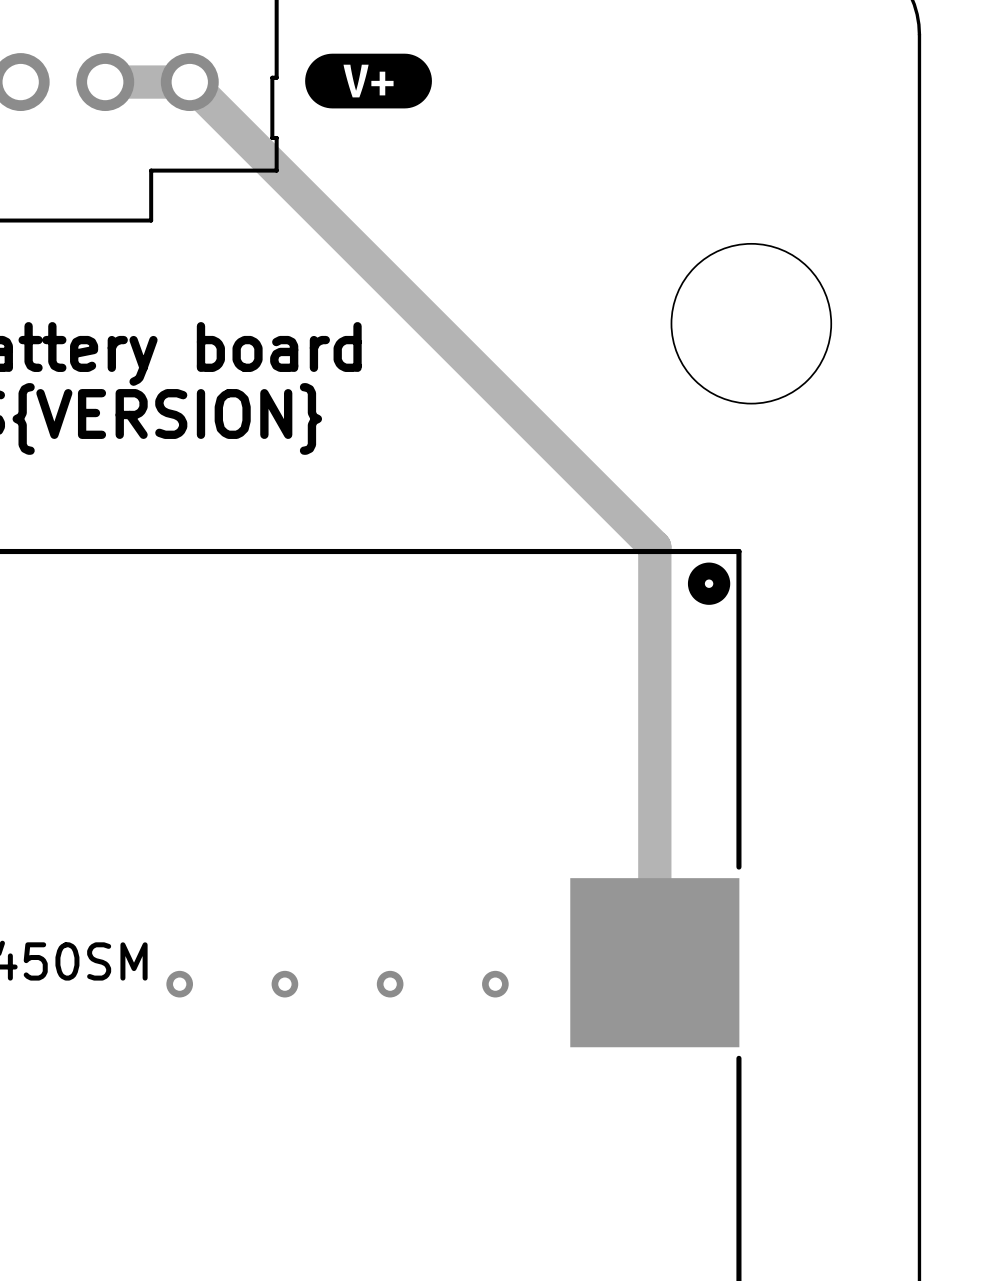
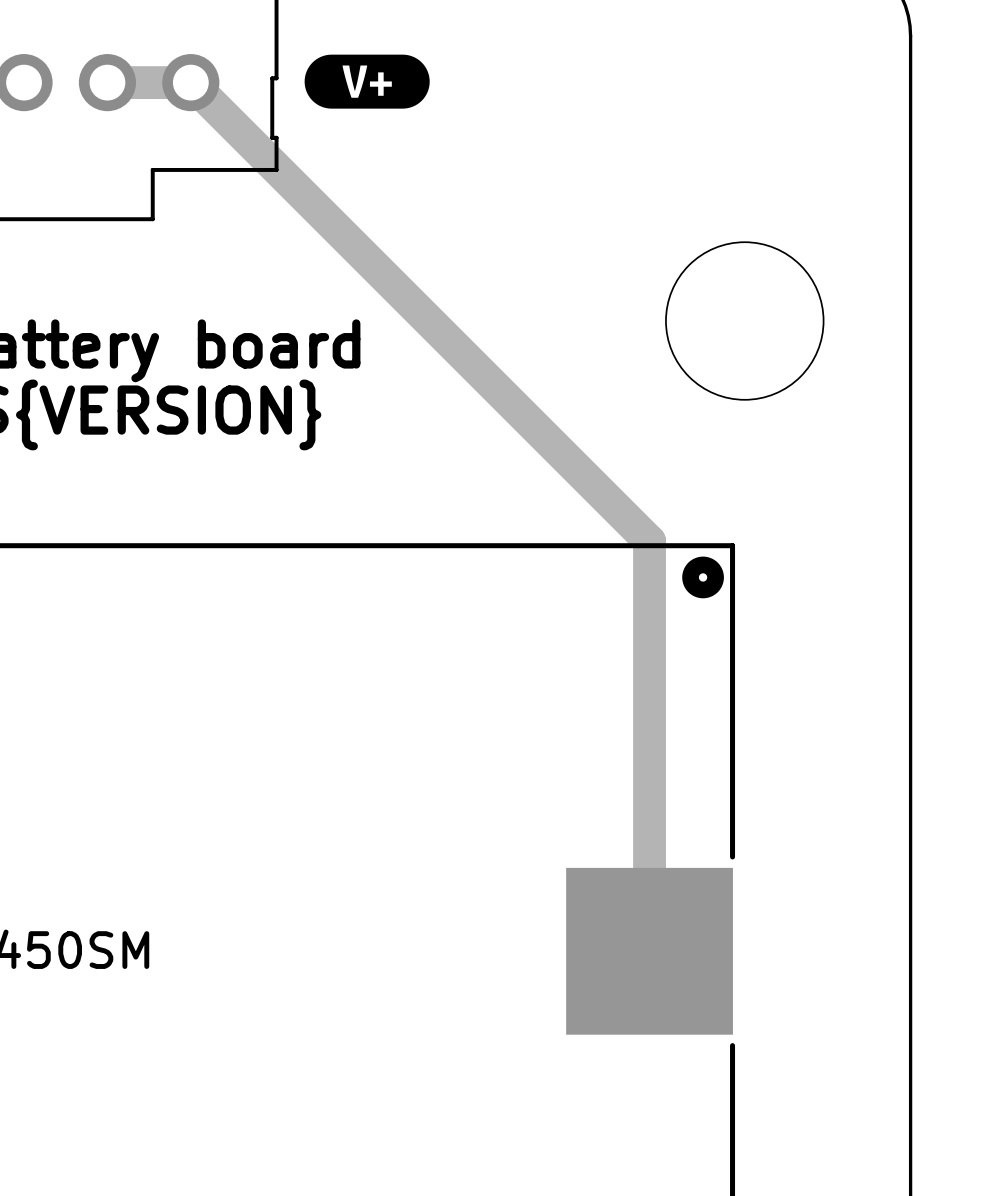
via: (179, 984) -> none
via: (284, 984) -> none
via: (390, 984) -> none
via: (495, 984) -> none

